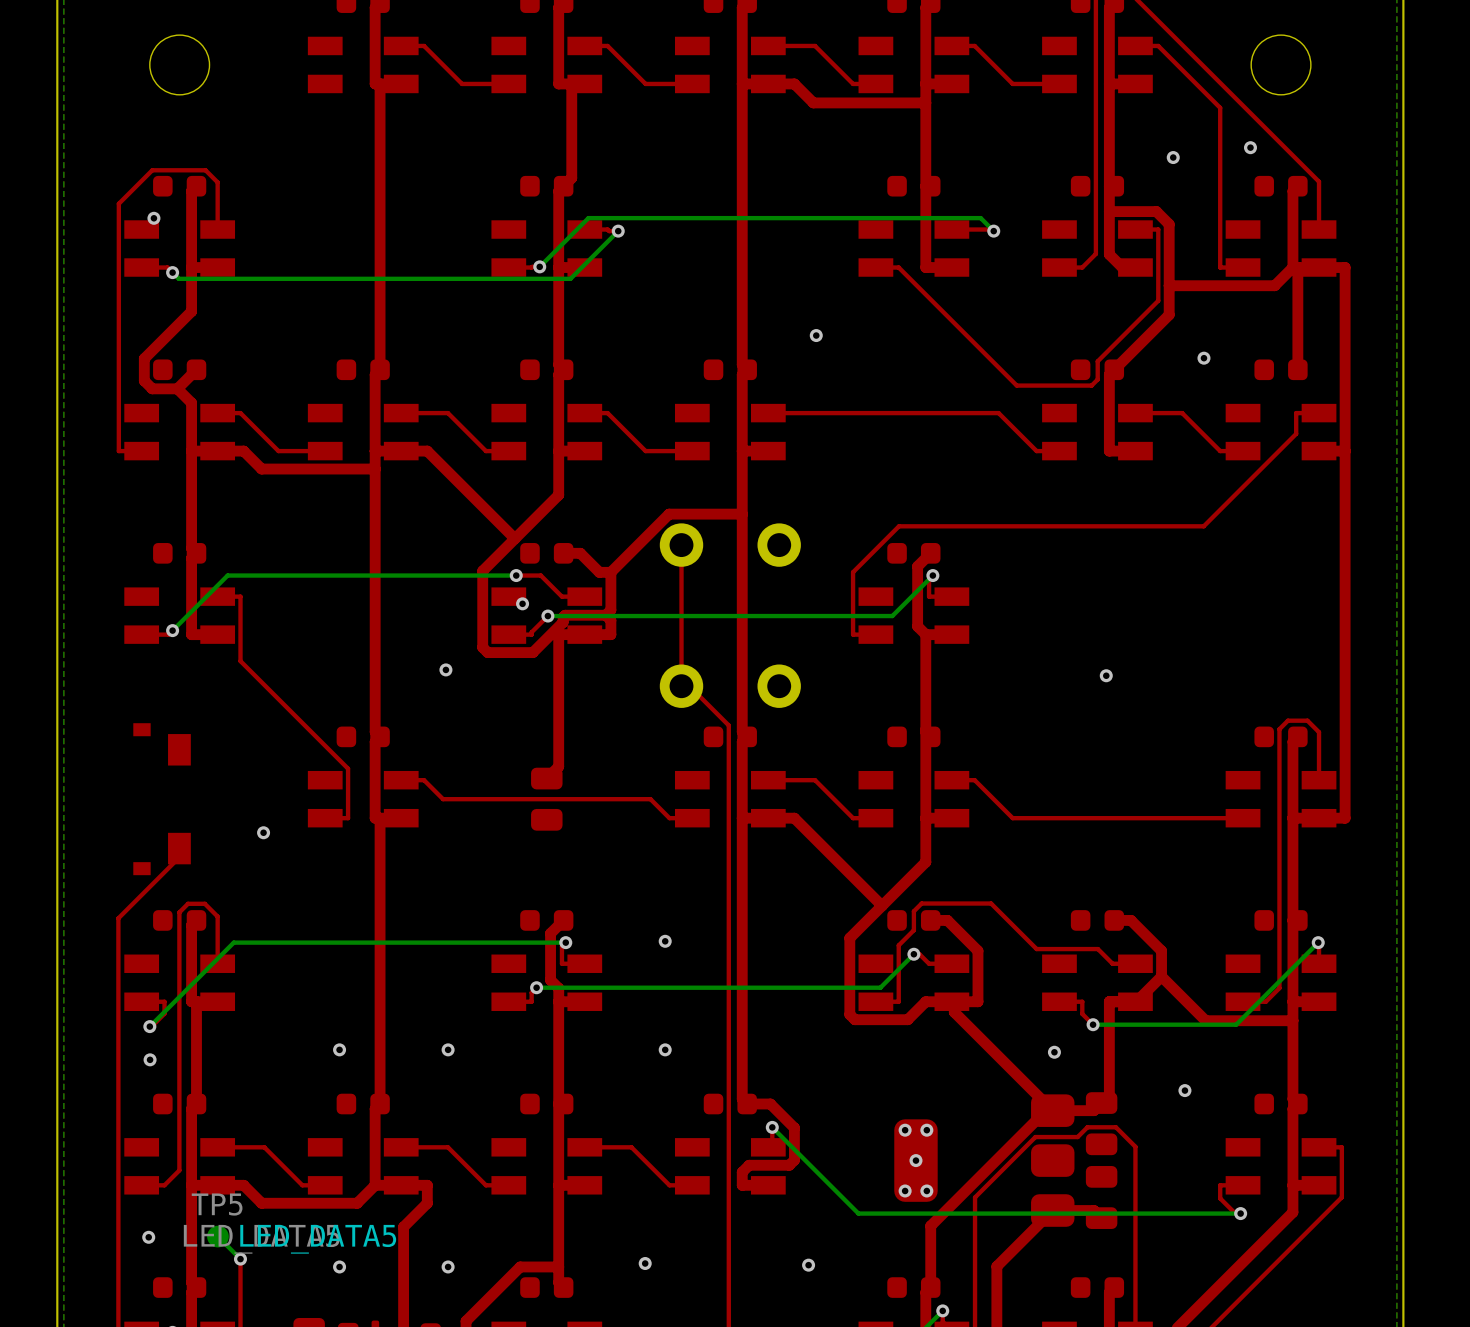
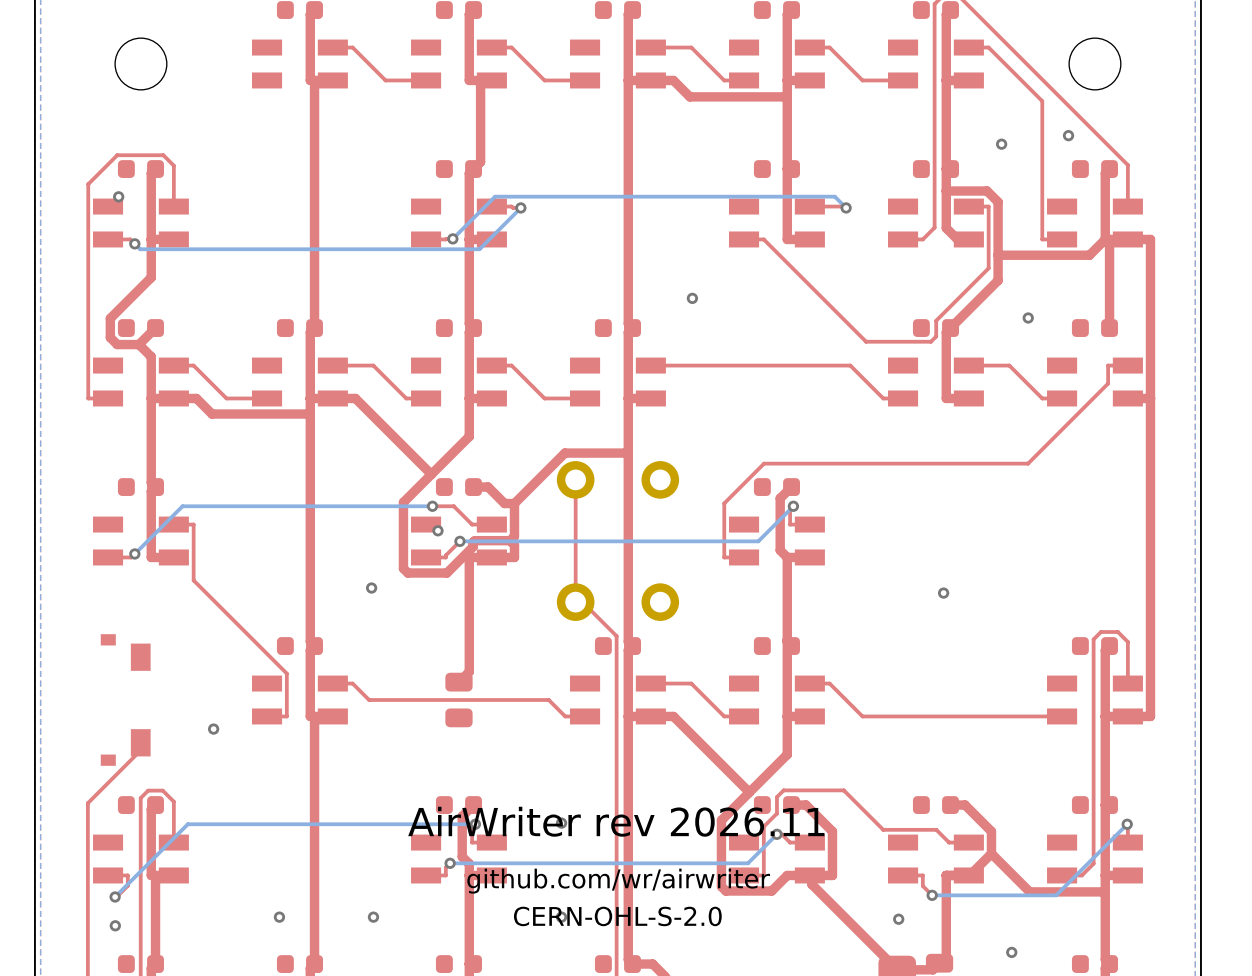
text: none -> AirWriter rev 2026.11 (616, 821)
text: none -> github.com/wr/airwriter (618, 881)
text: none -> CERN-OHL-S-2.0 (617, 916)

